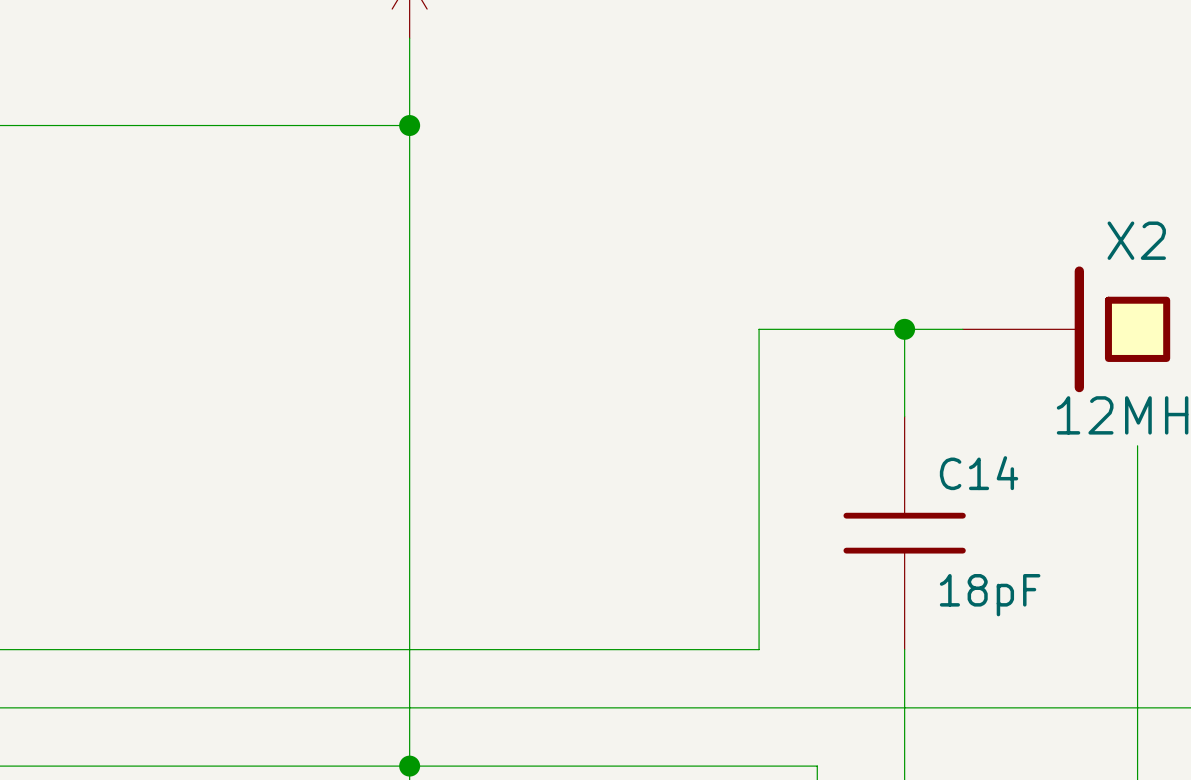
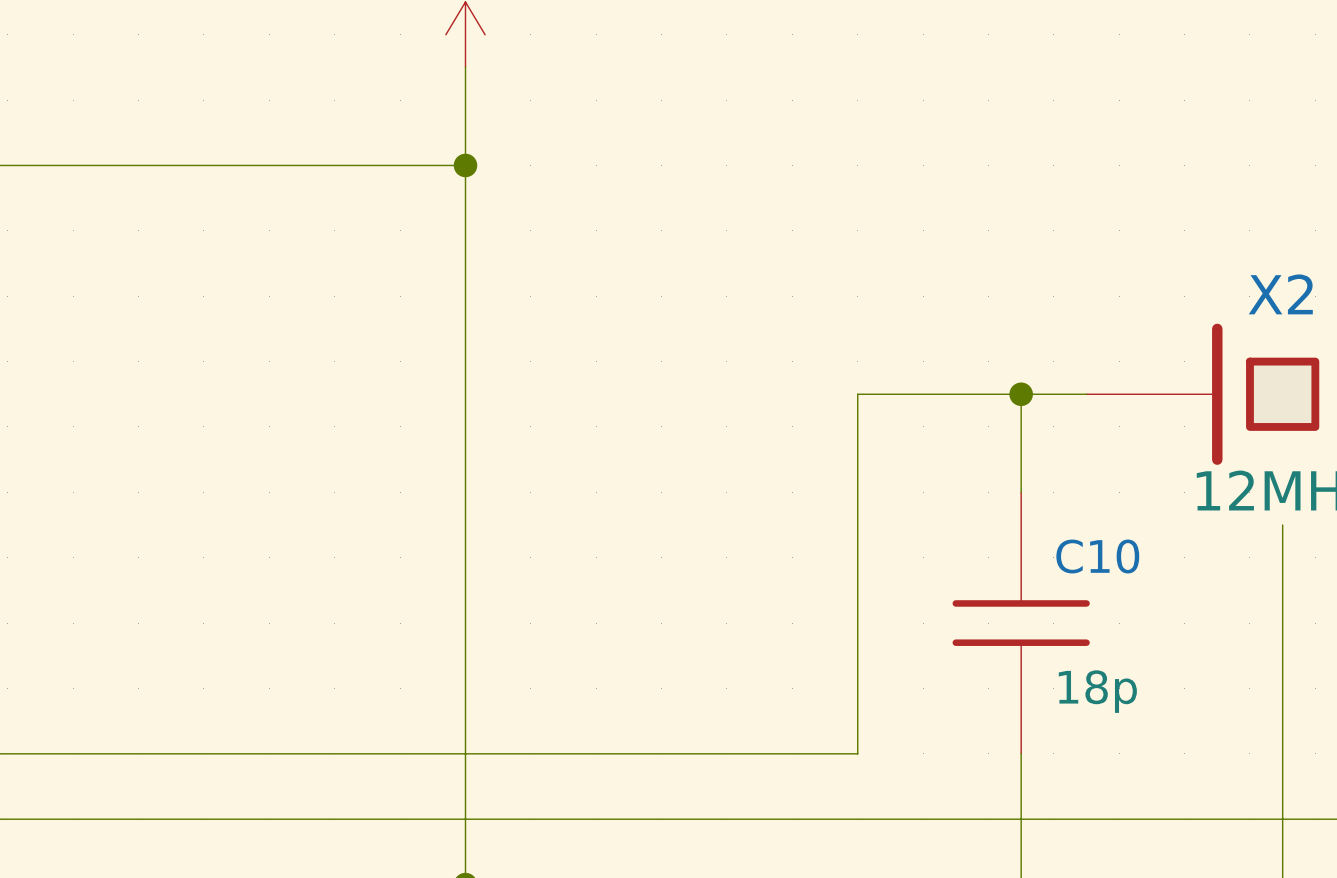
C14 name: C14 (979, 473) -> C10 (1097, 556)
C14 value: 18pF (990, 595) -> 18p (1097, 691)

